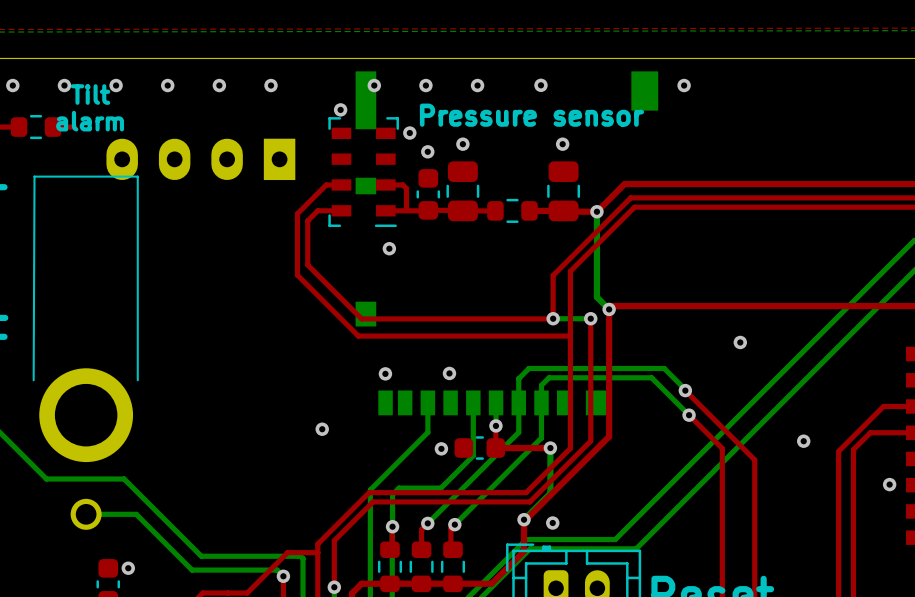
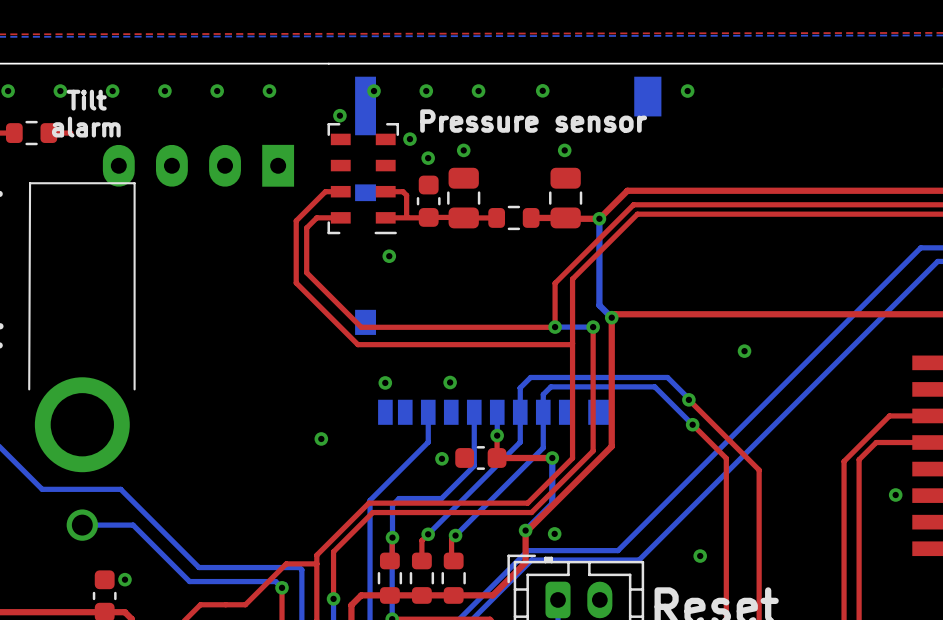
via: (803, 441) -> none
via: none -> (700, 556)

